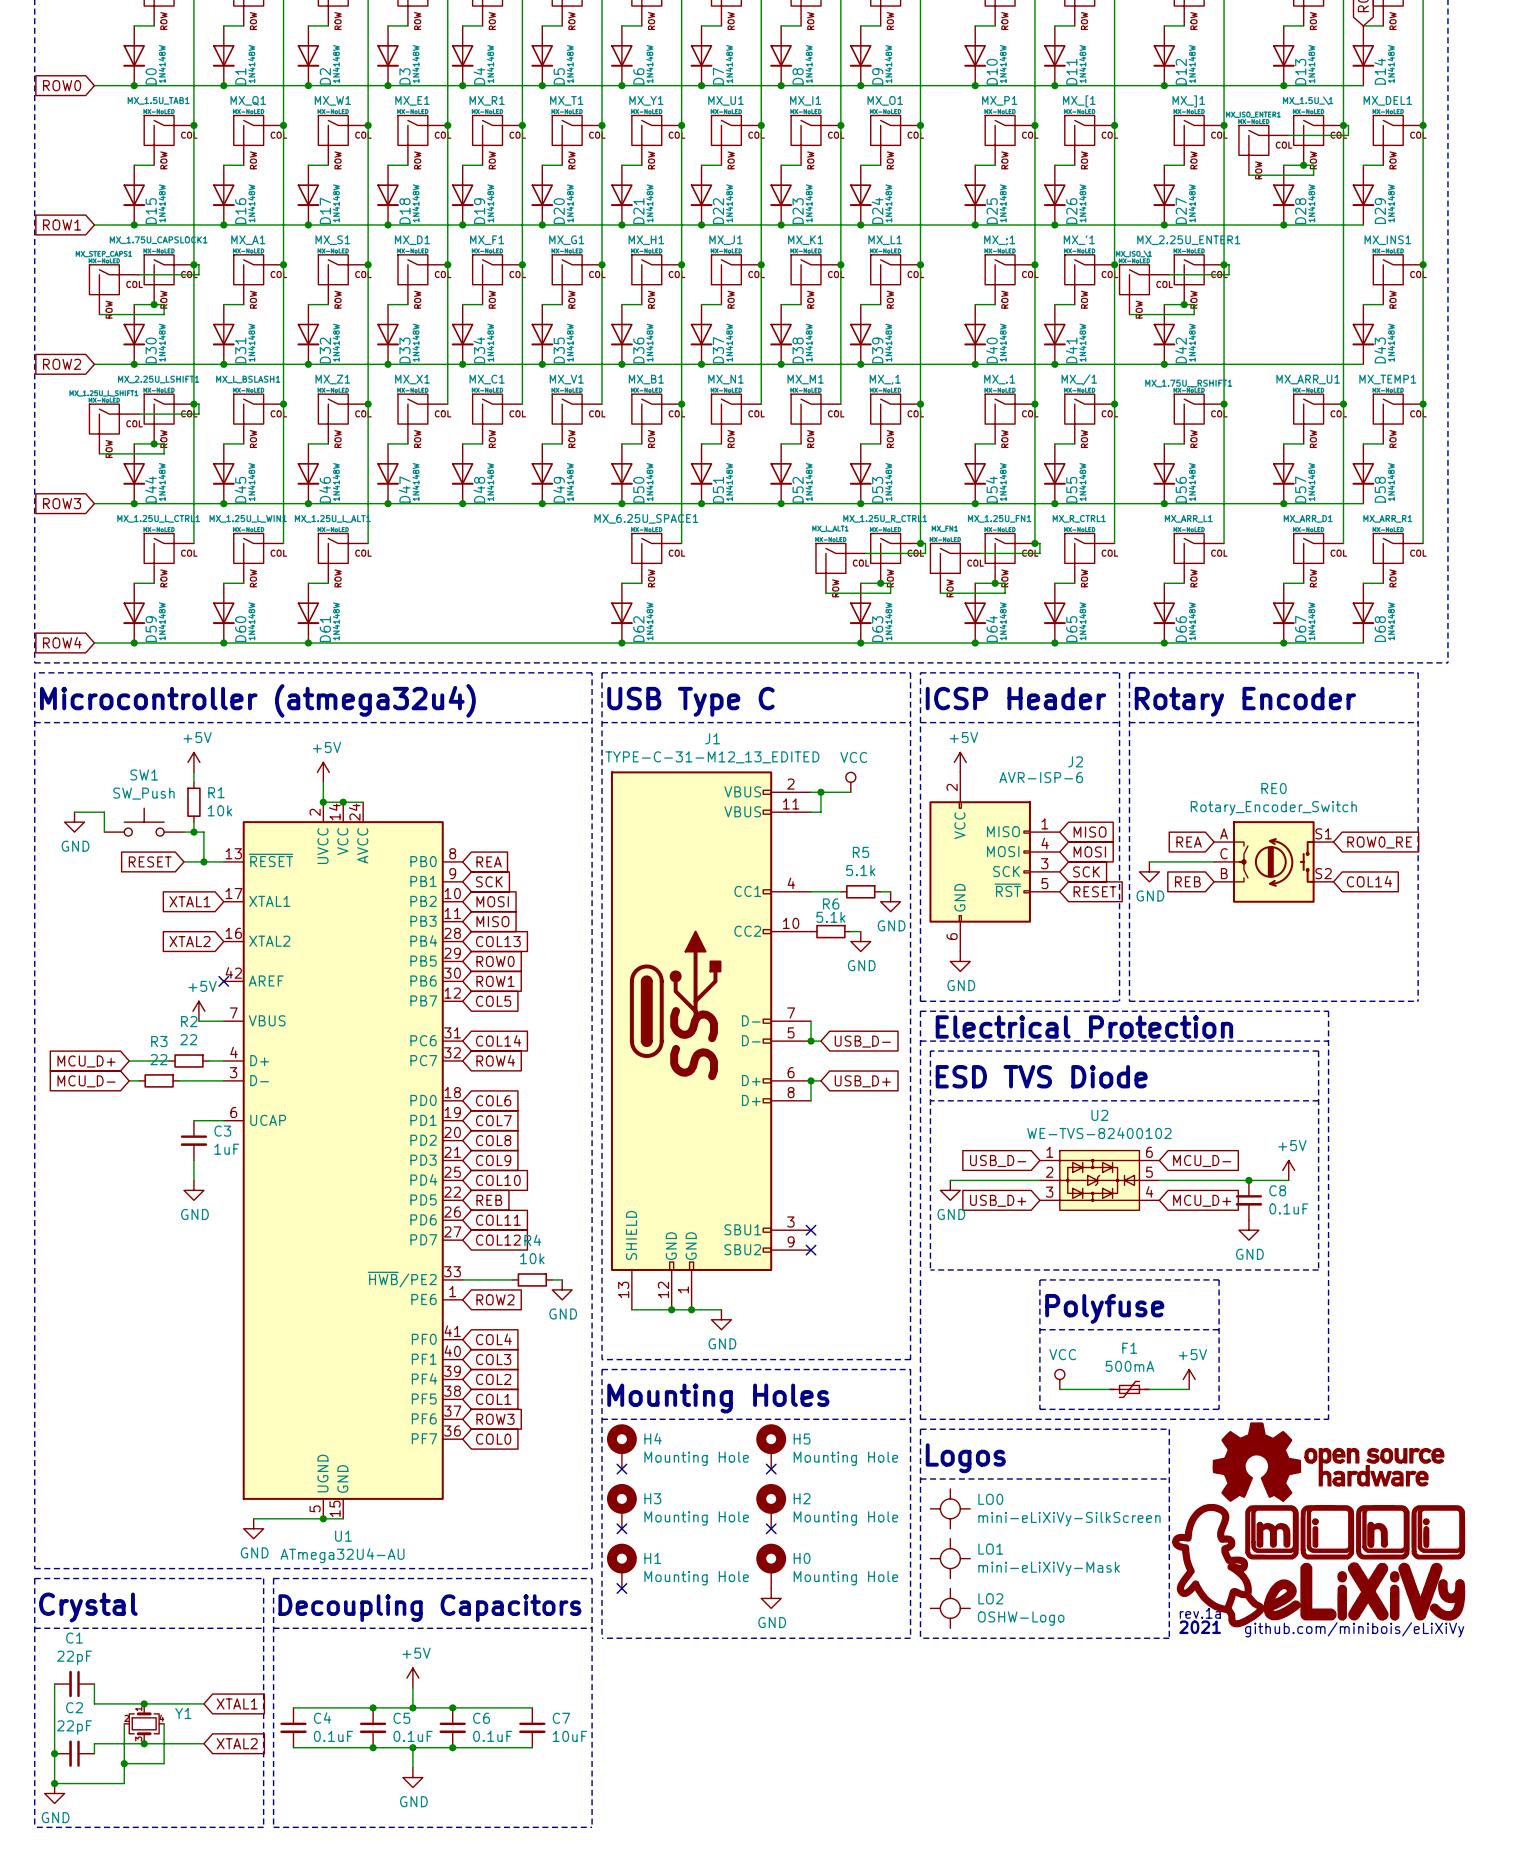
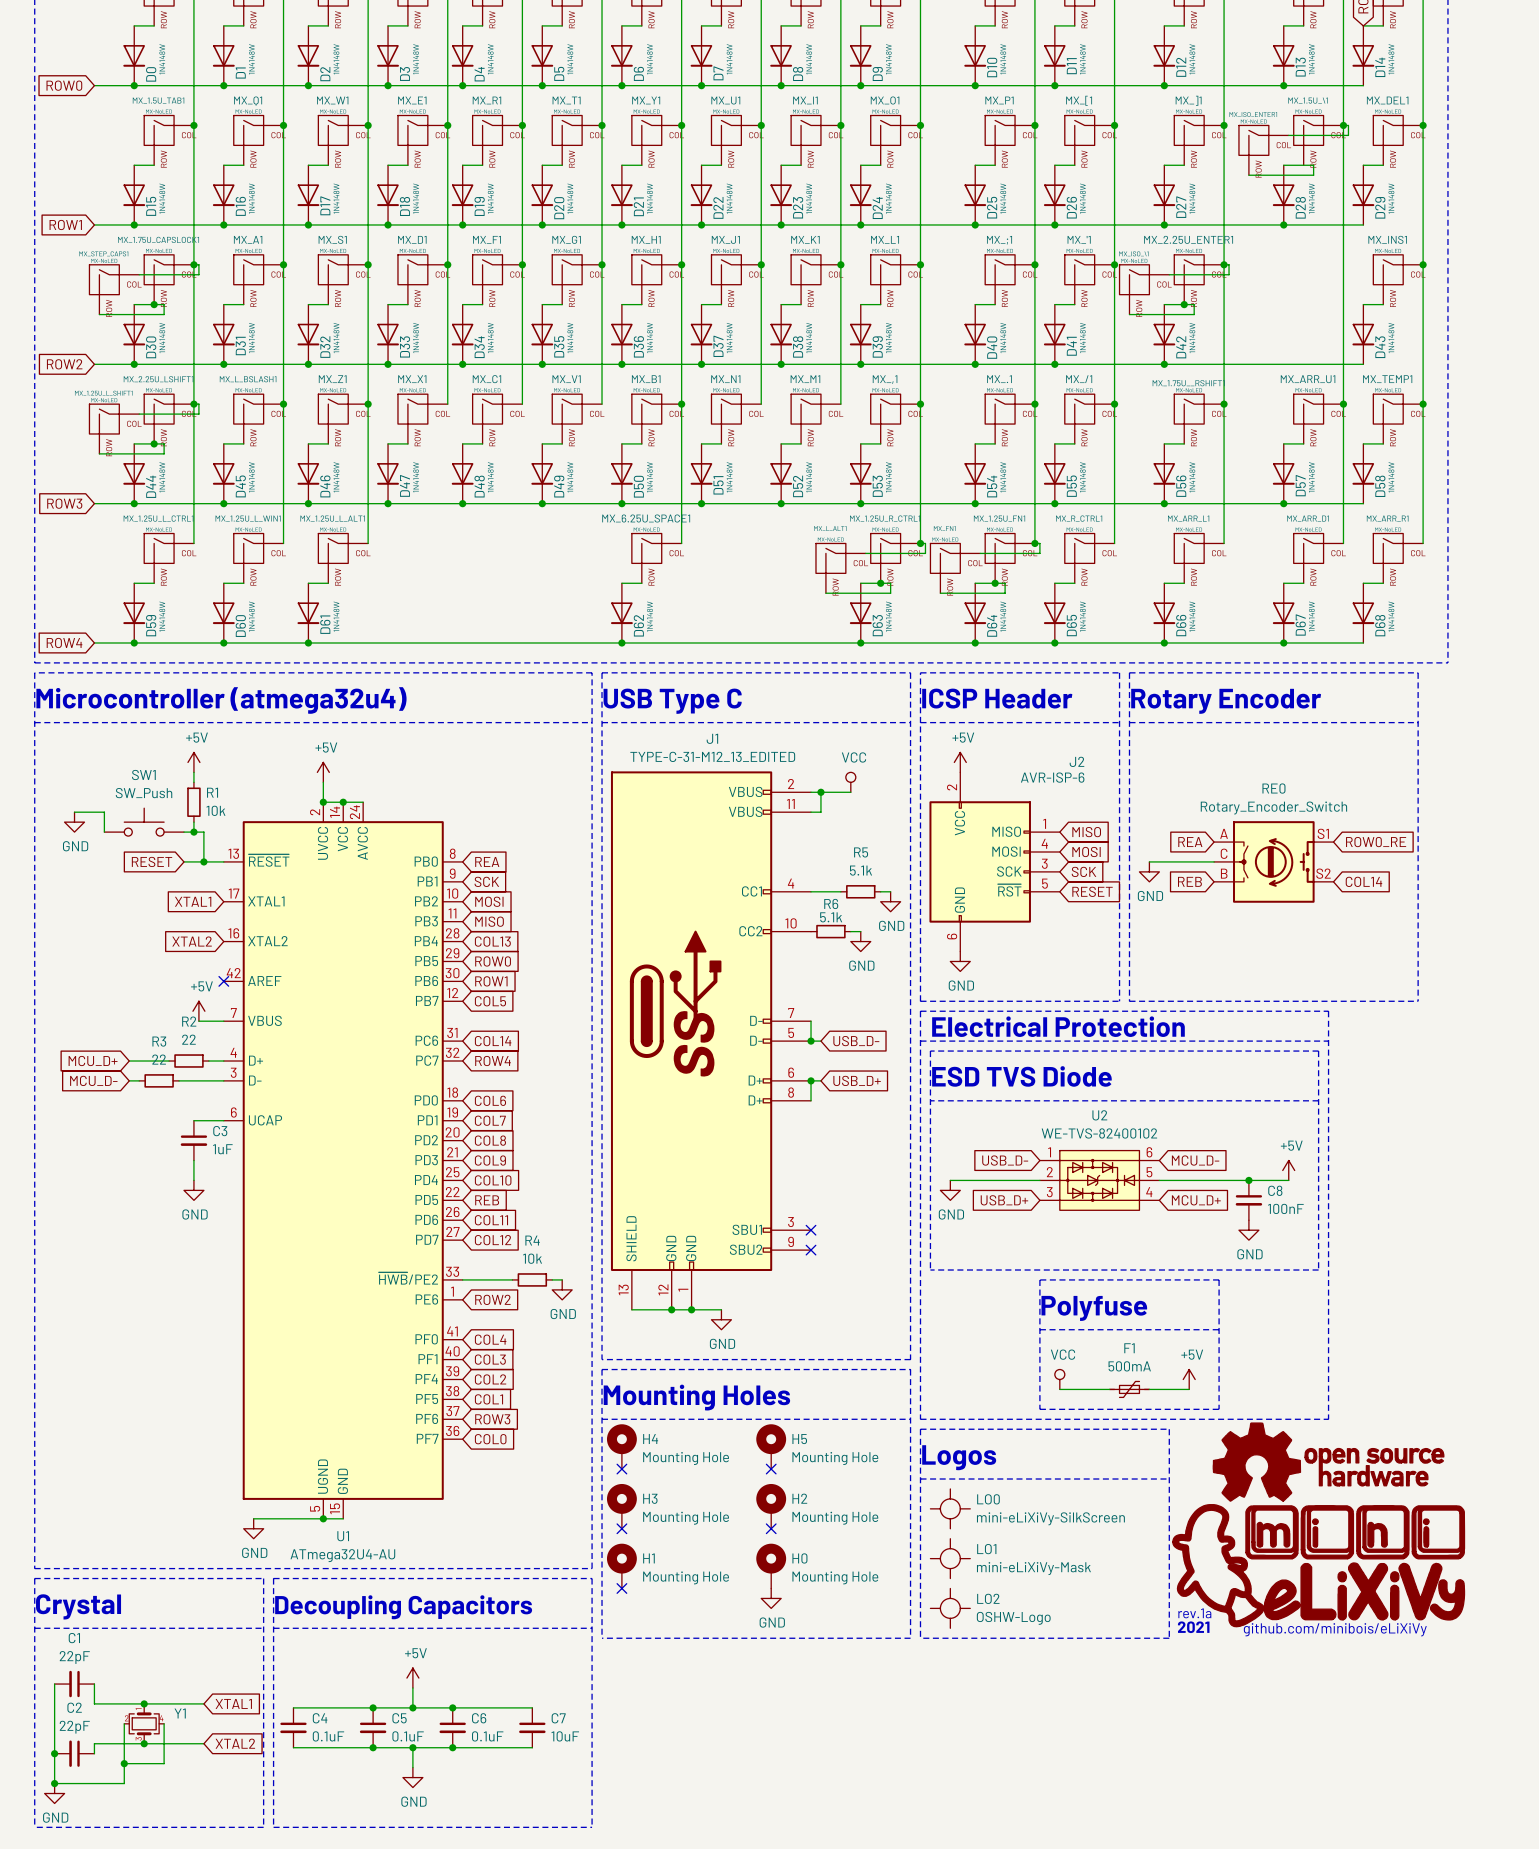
junction: (1303, 165) -> none
C8 value: 0.1uF (1288, 1208) -> 100nF (1285, 1208)

